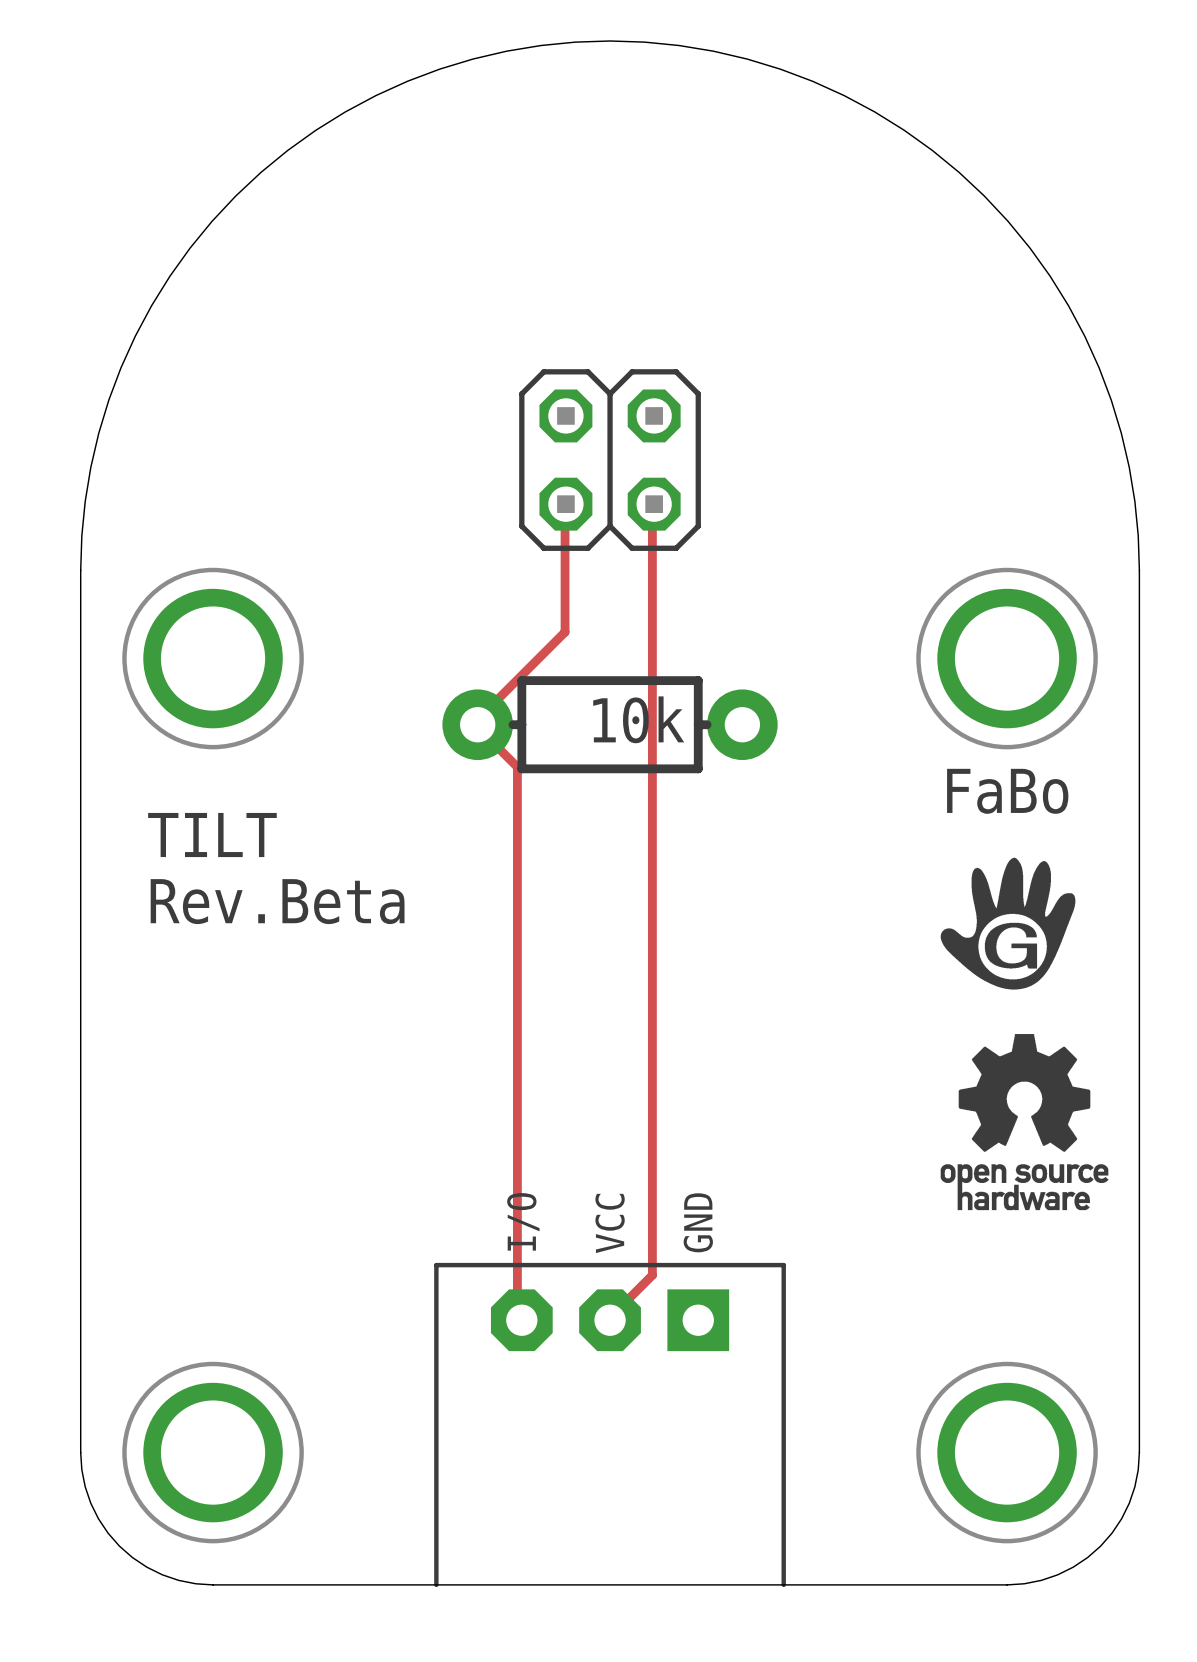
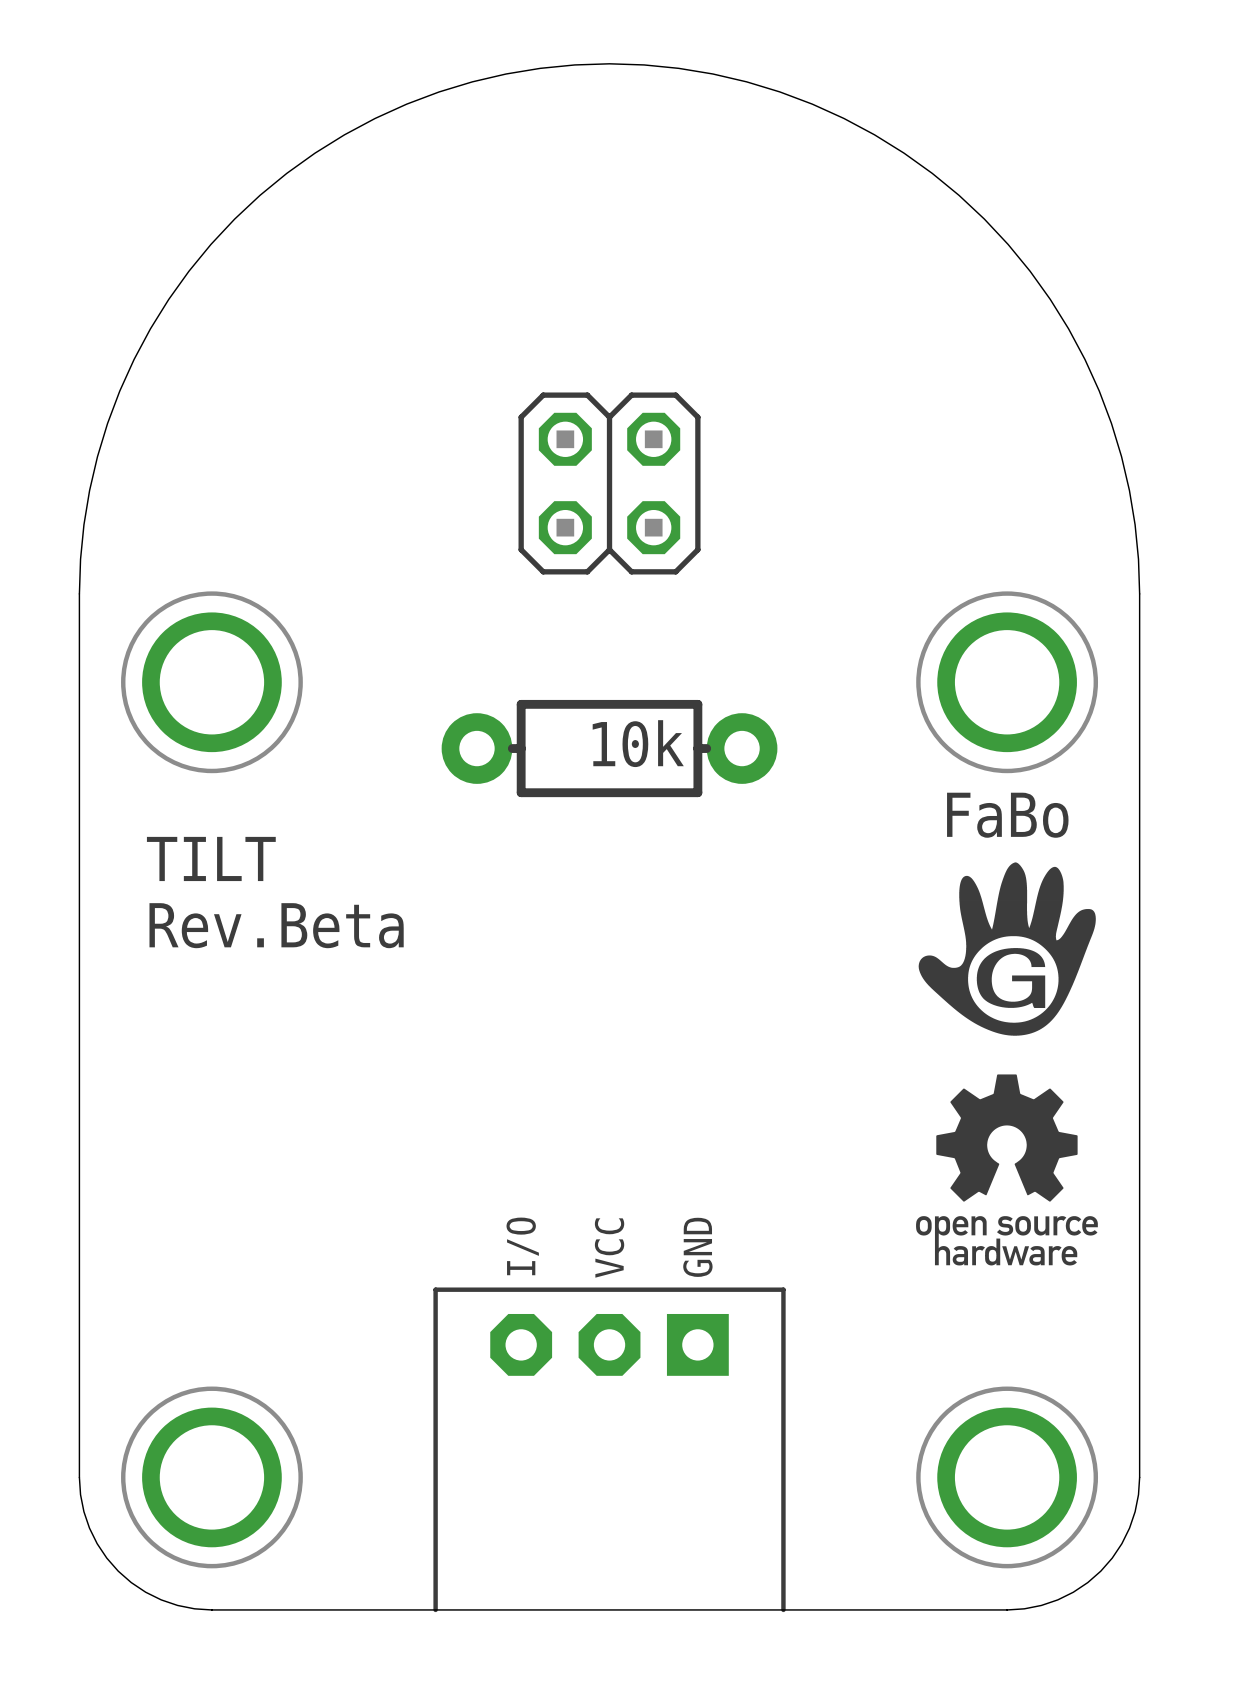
track: (565, 504) (565, 632) (477, 719) (477, 727) (517, 767) (517, 1314) (521, 1320) -> none
track: (654, 504) (652, 505) (652, 1275) (612, 1314) (610, 1320) -> none
drawing shape: [940, 857, 1076, 990] -> [918, 862, 1096, 1036]
drawing shape: [940, 1034, 1109, 1211] -> [916, 1074, 1098, 1266]

